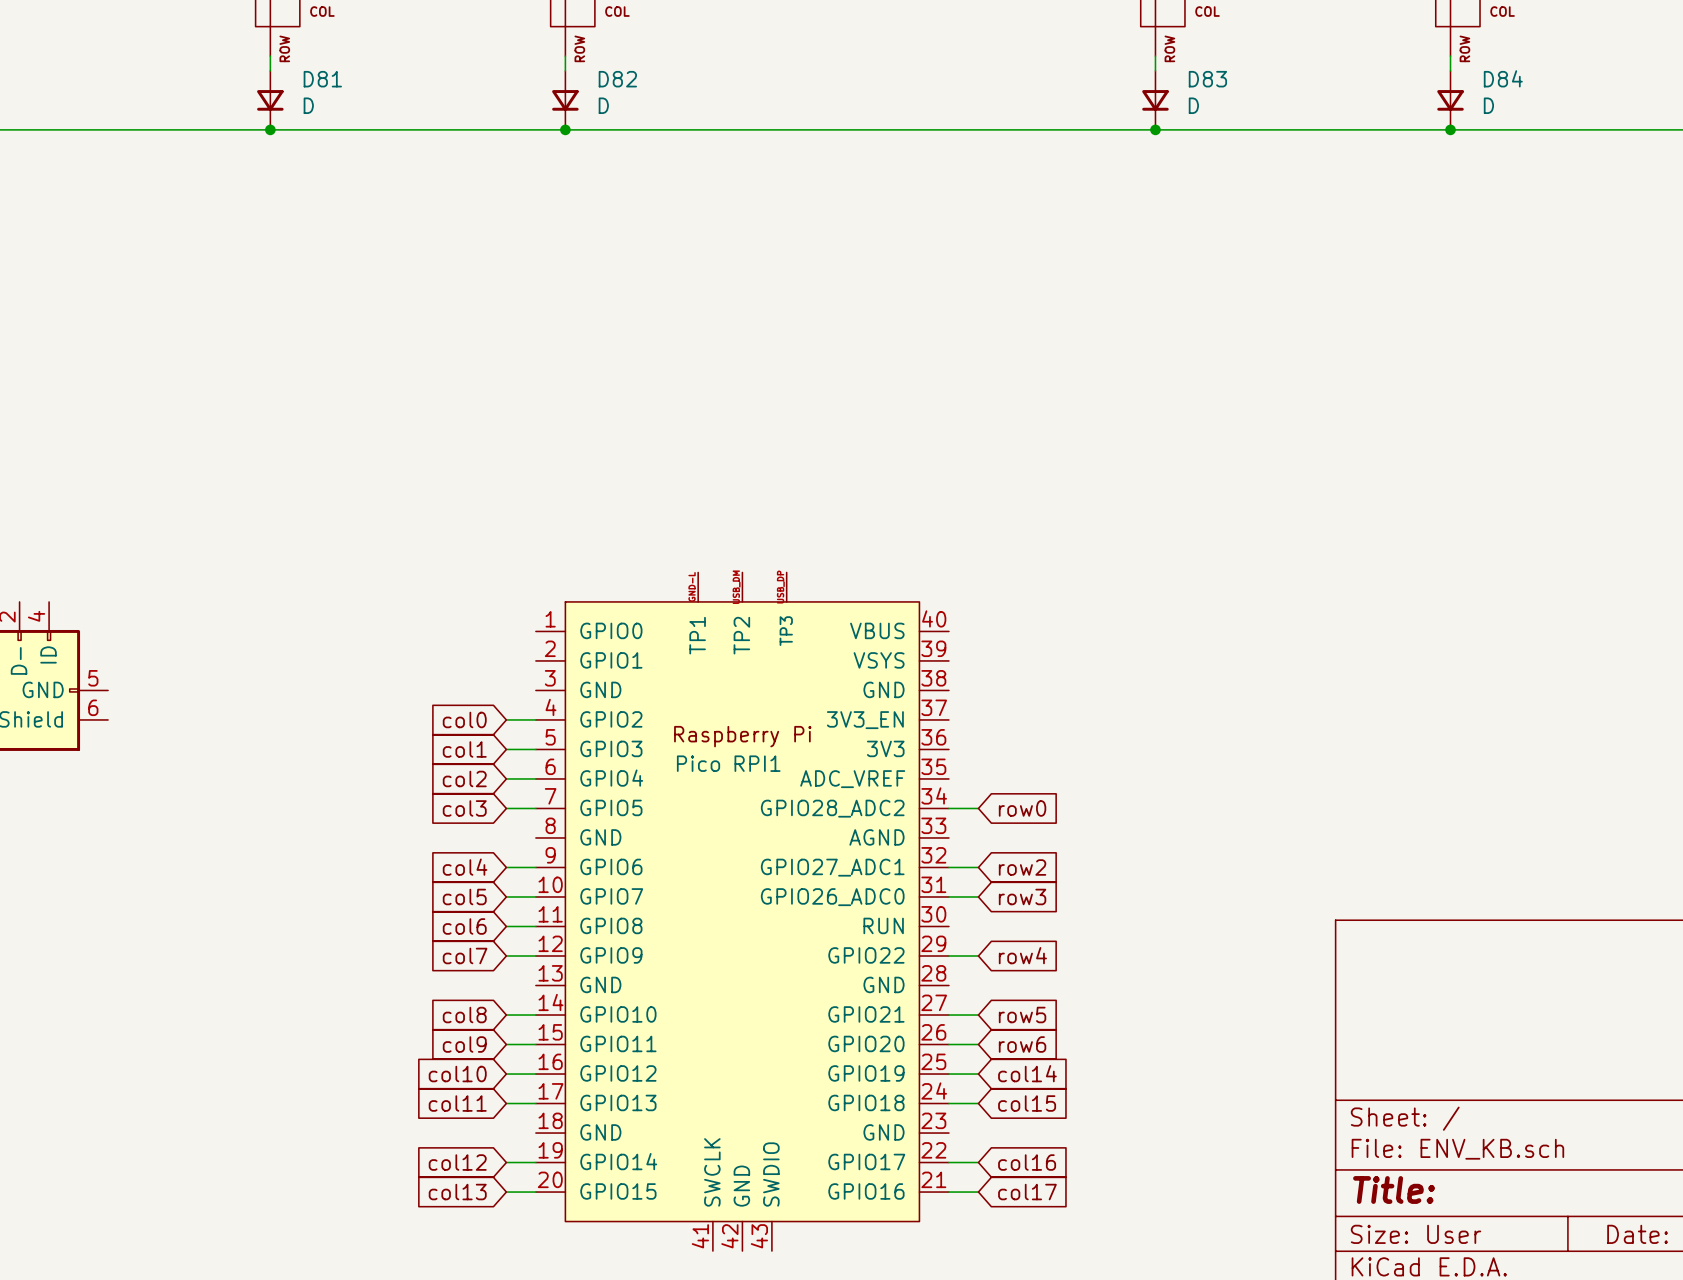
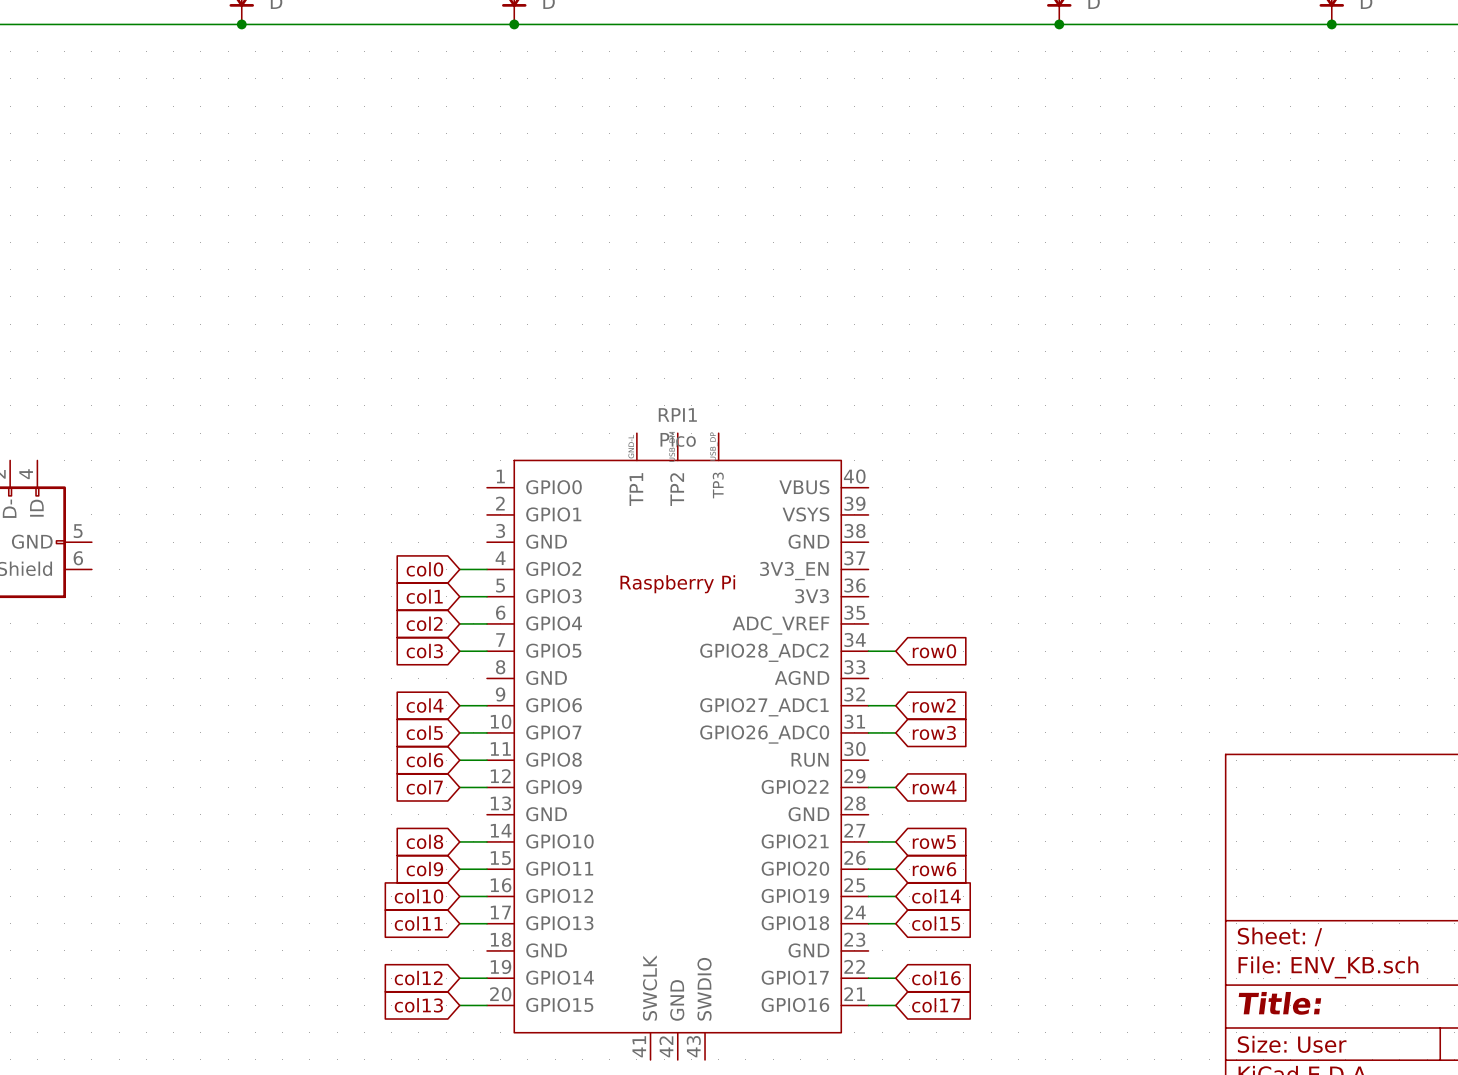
RPI1 value position: Pico (698, 763) -> Pico (678, 439)
RPI1 name position: RPI1 (757, 763) -> RPI1 (677, 414)

